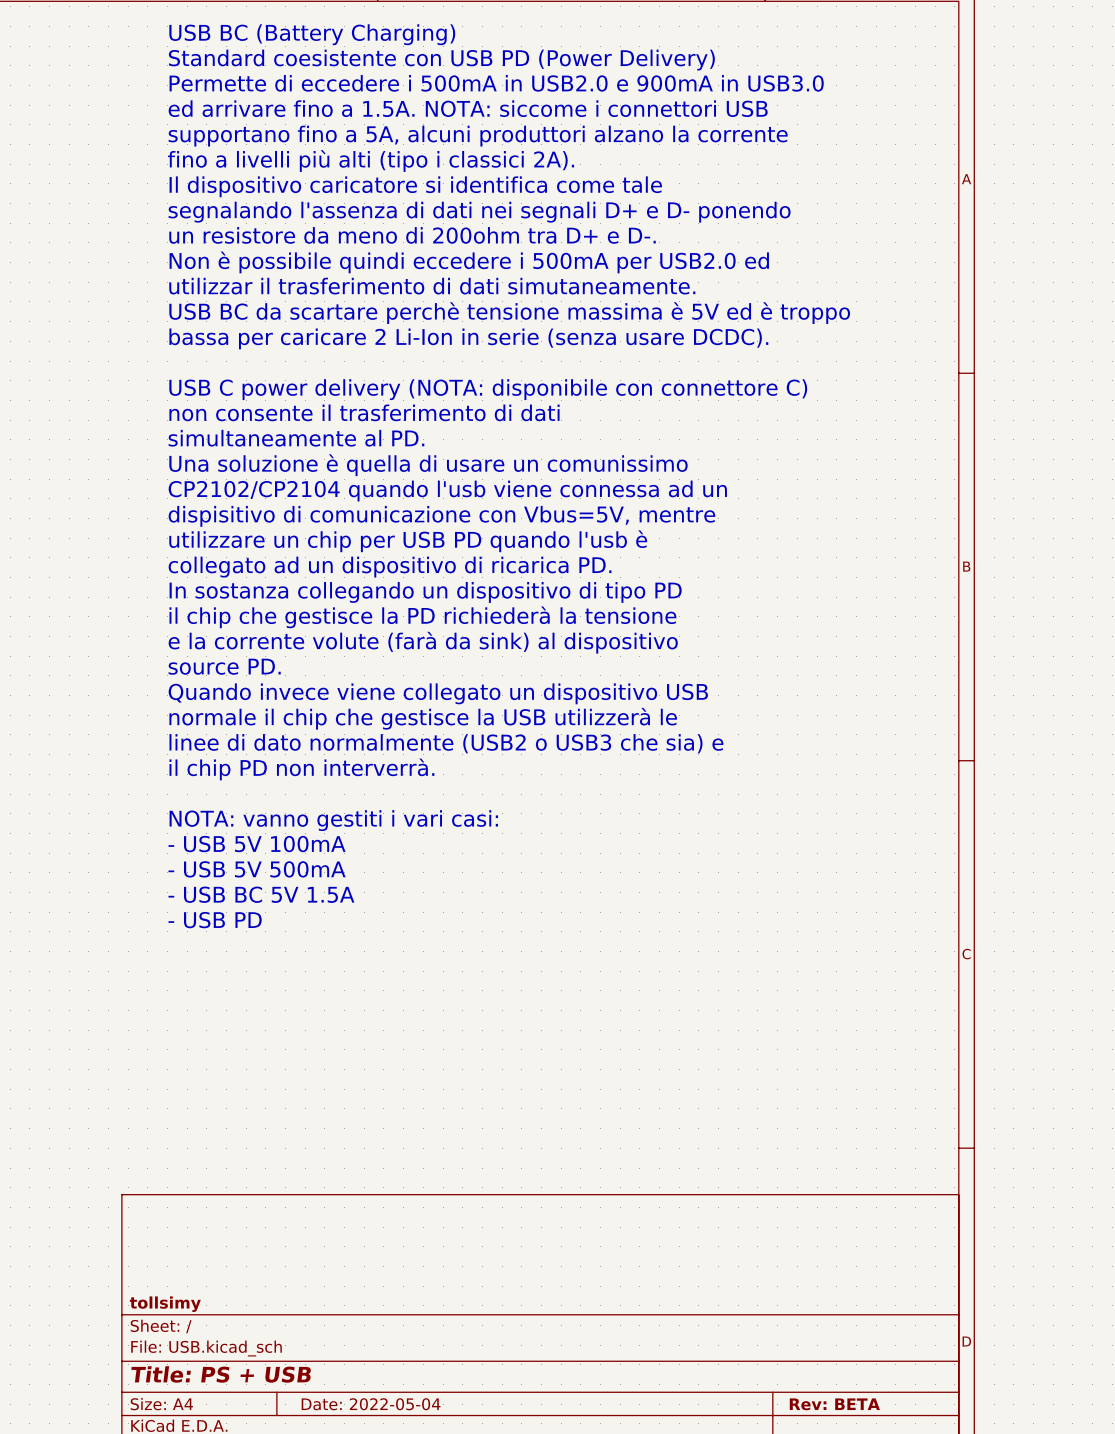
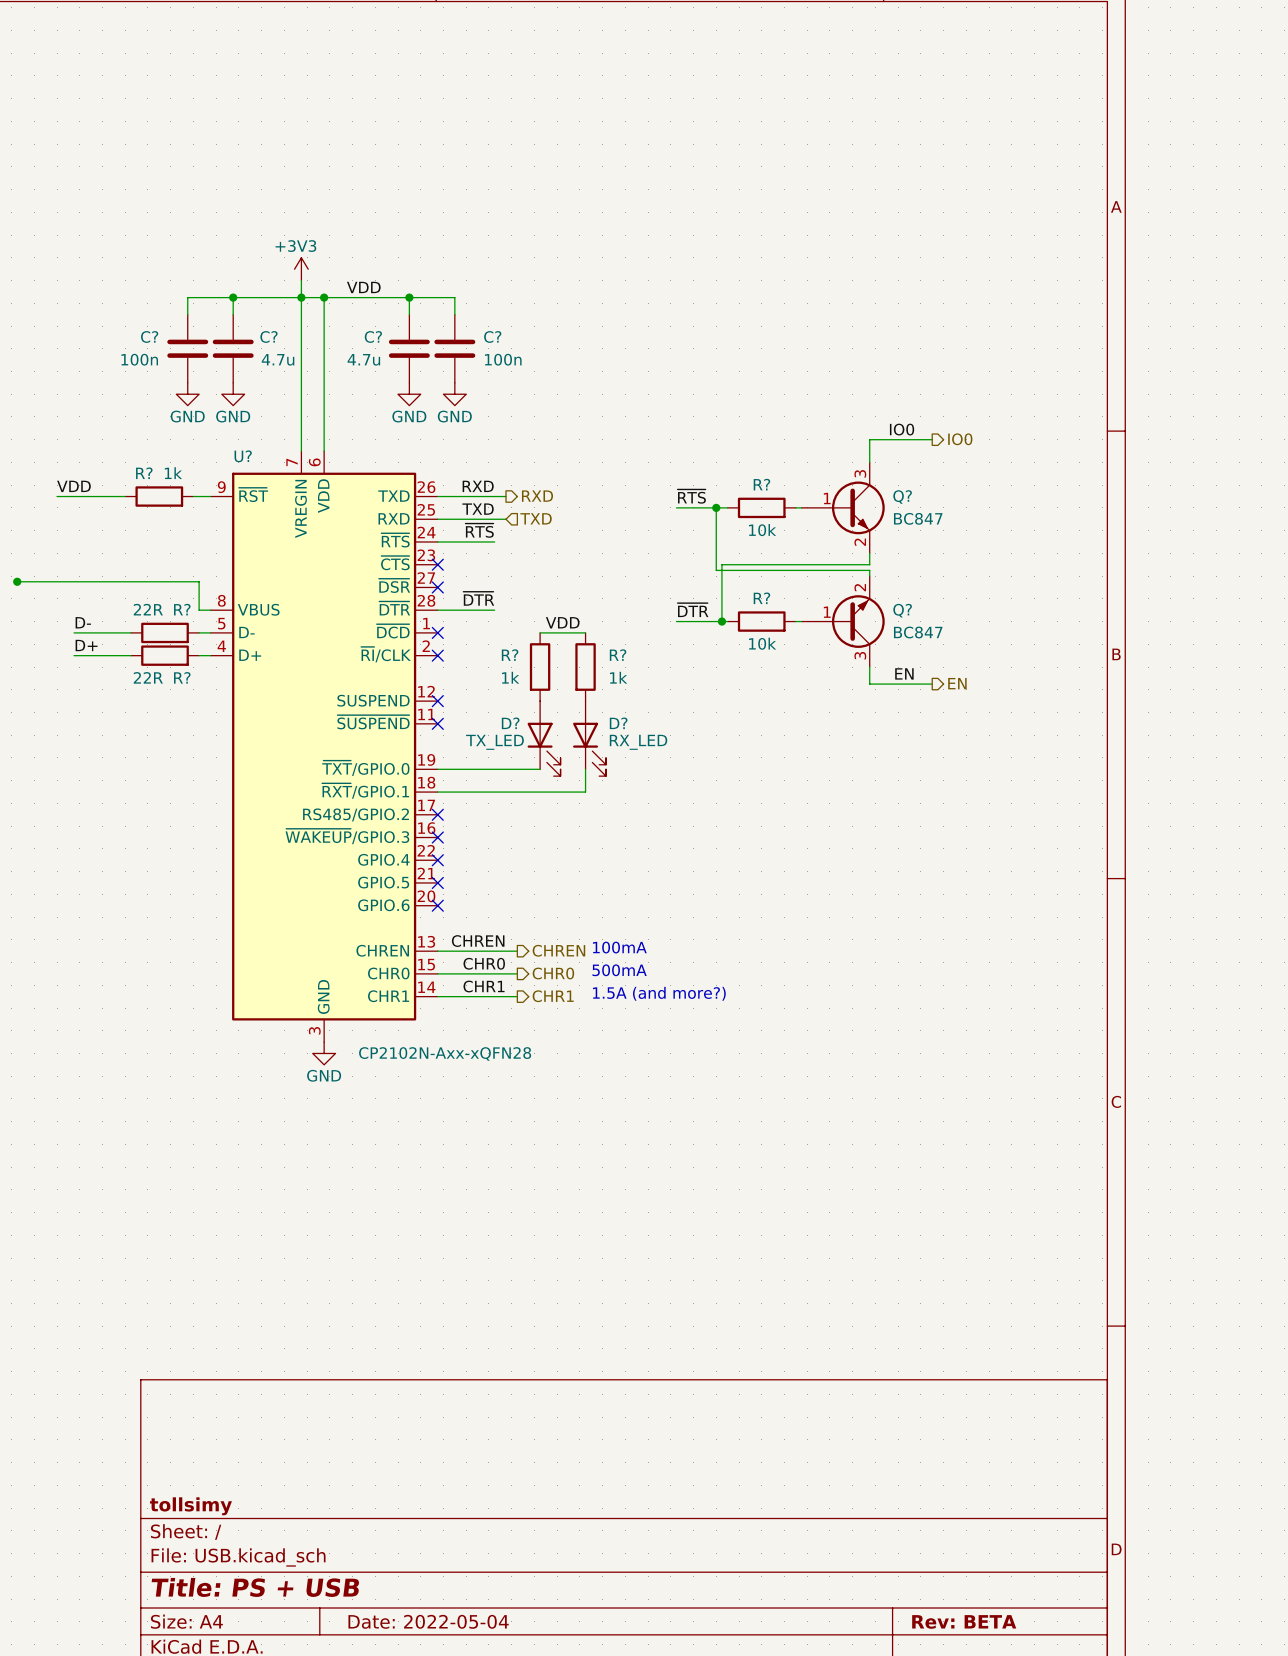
text: USB BC (Battery Charging) (312, 34) -> none
text: Standard coesistente con USB PD (Power Delivery) (441, 60) -> none
text: Permette di eccedere i 500mA in USB2.0 e 900mA in USB3.0 (496, 83) -> none
text: ed arrivare fino a 1.5A. NOTA: siccome i connettori USB (468, 108) -> none
text: supportano fino a 5A, alcuni produttori alzano la corrente (478, 136) -> none
text: fino a livelli più alti (tipo i classici 2A). (371, 161) -> none
text: Il dispositivo caricatore si identifica come tale (415, 186) -> none
text: segnalando l'assenza di dati nei segnali D+ e D- ponendo (479, 212) -> none
power symbol: none -> +3V3 (301, 269)
text: un resistore da meno di 200ohm tra D+ e D-. (412, 235) -> none
wire: none -> (301, 280) (301, 451)
label: none -> VDD (363, 287)
wire: none -> (233, 297) (233, 314)
junction: none -> (233, 297)
junction: none -> (301, 297)
wire: none -> (324, 297) (324, 451)
junction: none -> (324, 297)
wire: none -> (409, 297) (409, 314)
junction: none -> (409, 297)
text: Non è possibile quindi eccedere i 500mA per USB2.0 ed (469, 262) -> none
wire: none -> (187, 314) (187, 297) (454, 297) (454, 314)
text: utilizzar il trasferimento di dati simutaneamente. (432, 286) -> none
C?: none -> 100n (187, 348)
C?: none -> 4.7u (233, 348)
C?: none -> 4.7u (409, 348)
C?: none -> 100n (454, 348)
text: USB BC da scartare perchè tensione massima è 5V ed è troppo (509, 313) -> none
text: bassa per caricare 2 Li-Ion in serie (senza usare DCDC). (468, 338) -> none
power symbol: none -> GND (187, 394)
power symbol: none -> GND (233, 394)
power symbol: none -> GND (409, 394)
power symbol: none -> GND (454, 394)
label: none -> IO0 (902, 429)
wire: none -> (932, 439) (869, 439) (869, 462)
hierarchical label: none -> IO0 (960, 439)
text: USB C power delivery (NOTA: disponibile con connettore C) (488, 389) -> none
text: non consente il trasferimento di dati (364, 412) -> none
label: none -> VDD (73, 486)
label: none -> RXD (478, 486)
wire: none -> (57, 496) (125, 496)
R?: none -> 1k (159, 496)
wire: none -> (193, 496) (210, 496)
wire: none -> (437, 496) (505, 496)
hierarchical label: none -> RXD (537, 496)
label: none -> ~{RTS} (691, 496)
text: simultaneamente al PD. (296, 438) -> none
wire: none -> (676, 507) (727, 507)
wire: none -> (716, 507) (716, 570) (869, 570) (869, 576)
junction: none -> (716, 507)
R?: none -> 10k (761, 507)
wire: none -> (795, 507) (801, 507)
Q?: none -> BC847 (843, 507)
label: none -> TXD (478, 509)
wire: none -> (437, 519) (505, 519)
hierarchical label: none -> TXD (536, 518)
label: none -> ~{RTS} (479, 530)
text: Una soluzione è quella di usare un comunissimo (428, 465) -> none
wire: none -> (437, 541) (494, 541)
wire: none -> (869, 553) (869, 564) (721, 564) (721, 621)
no-connect mark: none -> (437, 564)
text: CP2102/CP2104 quando l'usb viene connessa ad un (447, 491) -> none
wire: none -> (17, 581) (199, 581) (199, 610) (210, 610)
junction: none -> (17, 581)
no-connect mark: none -> (437, 587)
text: dispisitivo di comunicazione con Vbus=5V, mentre (441, 516) -> none
label: none -> ~{DTR} (478, 598)
wire: none -> (437, 610) (494, 610)
label: none -> ~{DTR} (693, 610)
wire: none -> (676, 621) (727, 621)
junction: none -> (721, 621)
R?: none -> 10k (761, 621)
wire: none -> (795, 621) (801, 621)
Q?: none -> BC847 (843, 621)
label: none -> D- (83, 622)
label: none -> VDD (562, 622)
text: utilizzare un chip per USB PD quando l'usb è (408, 541) -> none
wire: none -> (74, 632) (130, 632)
R?: none -> 22R (165, 632)
wire: none -> (199, 632) (210, 632)
no-connect mark: none -> (437, 632)
wire: none -> (540, 632) (585, 632)
label: none -> D+ (86, 645)
wire: none -> (74, 655) (130, 655)
R?: none -> 22R (165, 655)
wire: none -> (199, 655) (210, 655)
no-connect mark: none -> (437, 655)
text: collegato ad un dispositivo di ricarica PD. (390, 567) -> none
R?: none -> 1k (540, 667)
R?: none -> 1k (585, 667)
wire: none -> (869, 667) (869, 684) (932, 684)
label: none -> EN (904, 673)
hierarchical label: none -> EN (957, 683)
text: In sostanza collegando un dispositivo di tipo PD (425, 592) -> none
no-connect mark: none -> (437, 701)
text: il chip che gestisce la PD richiederà la tensione (422, 617) -> none
no-connect mark: none -> (437, 723)
D?: none -> TX_LED (544, 738)
D?: none -> RX_LED (589, 738)
text: e la corrente volute (farà da sink) al dispositivo (423, 642) -> none
U?: none -> CP2102N-Axx-xQFN28 (324, 746)
text: source PD. (224, 666) -> none
wire: none -> (437, 769) (540, 769)
wire: none -> (585, 769) (585, 792) (437, 792)
text: Quando invece viene collegato un dispositivo USB (438, 693) -> none
no-connect mark: none -> (437, 814)
text: normale il chip che gestisce la USB utilizzerà le (423, 718) -> none
no-connect mark: none -> (437, 837)
text: linee di dato normalmente (USB2 o USB3 che sia) e (446, 743) -> none
no-connect mark: none -> (437, 860)
no-connect mark: none -> (437, 882)
text: il chip PD non interverrà. (301, 769) -> none
no-connect mark: none -> (437, 905)
label: none -> CHREN (478, 941)
text: NOTA: vanno gestiti i vari casi: (333, 820) -> none
text: none -> 100mA (619, 947)
wire: none -> (437, 951) (517, 951)
hierarchical label: none -> CHREN (558, 950)
label: none -> CHR0 (484, 963)
text: none -> 500mA (619, 970)
hierarchical label: none -> CHR0 (553, 973)
wire: none -> (437, 973) (517, 973)
text: - USB 5V 100mA (257, 844) -> none
label: none -> CHR1 (484, 986)
text: none -> 1.5A (and more?) (659, 993)
wire: none -> (437, 996) (517, 996)
hierarchical label: none -> CHR1 (553, 996)
text: - USB 5V 500mA (257, 869) -> none
text: - USB BC 5V 1.5A (261, 894) -> none
power symbol: none -> GND (324, 1053)
text: - USB PD (215, 920) -> none

